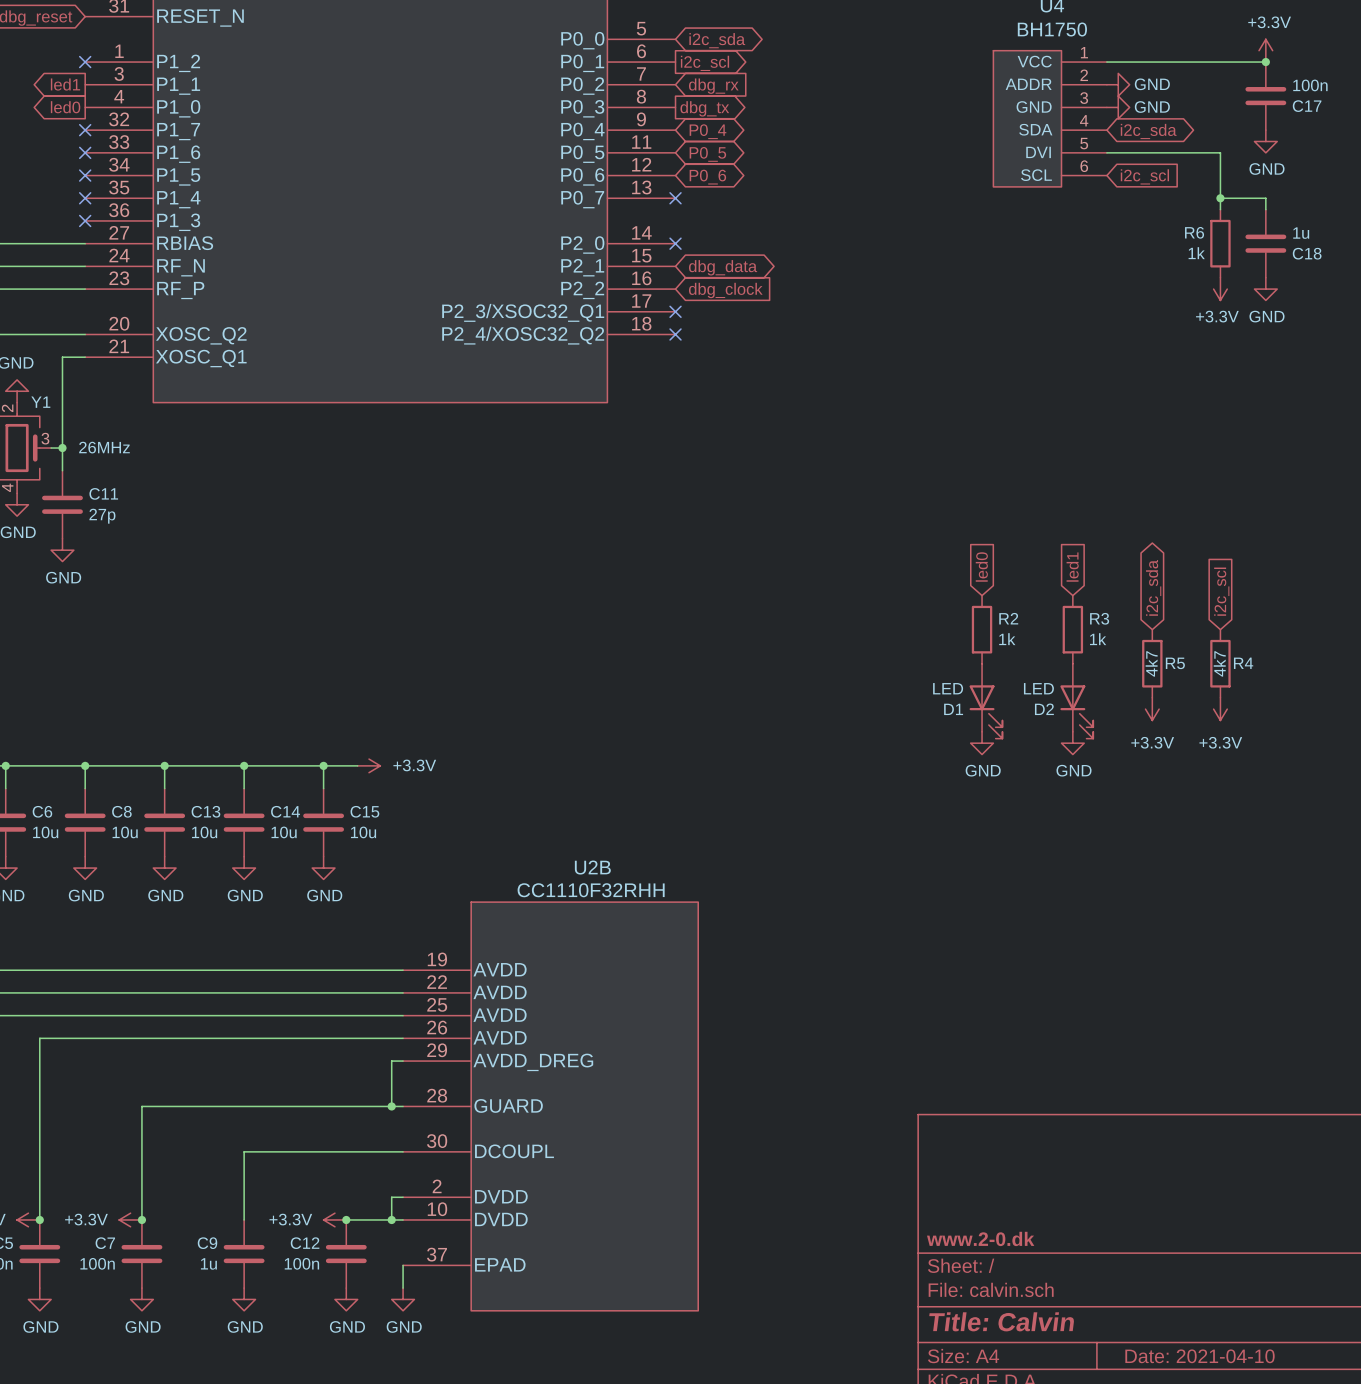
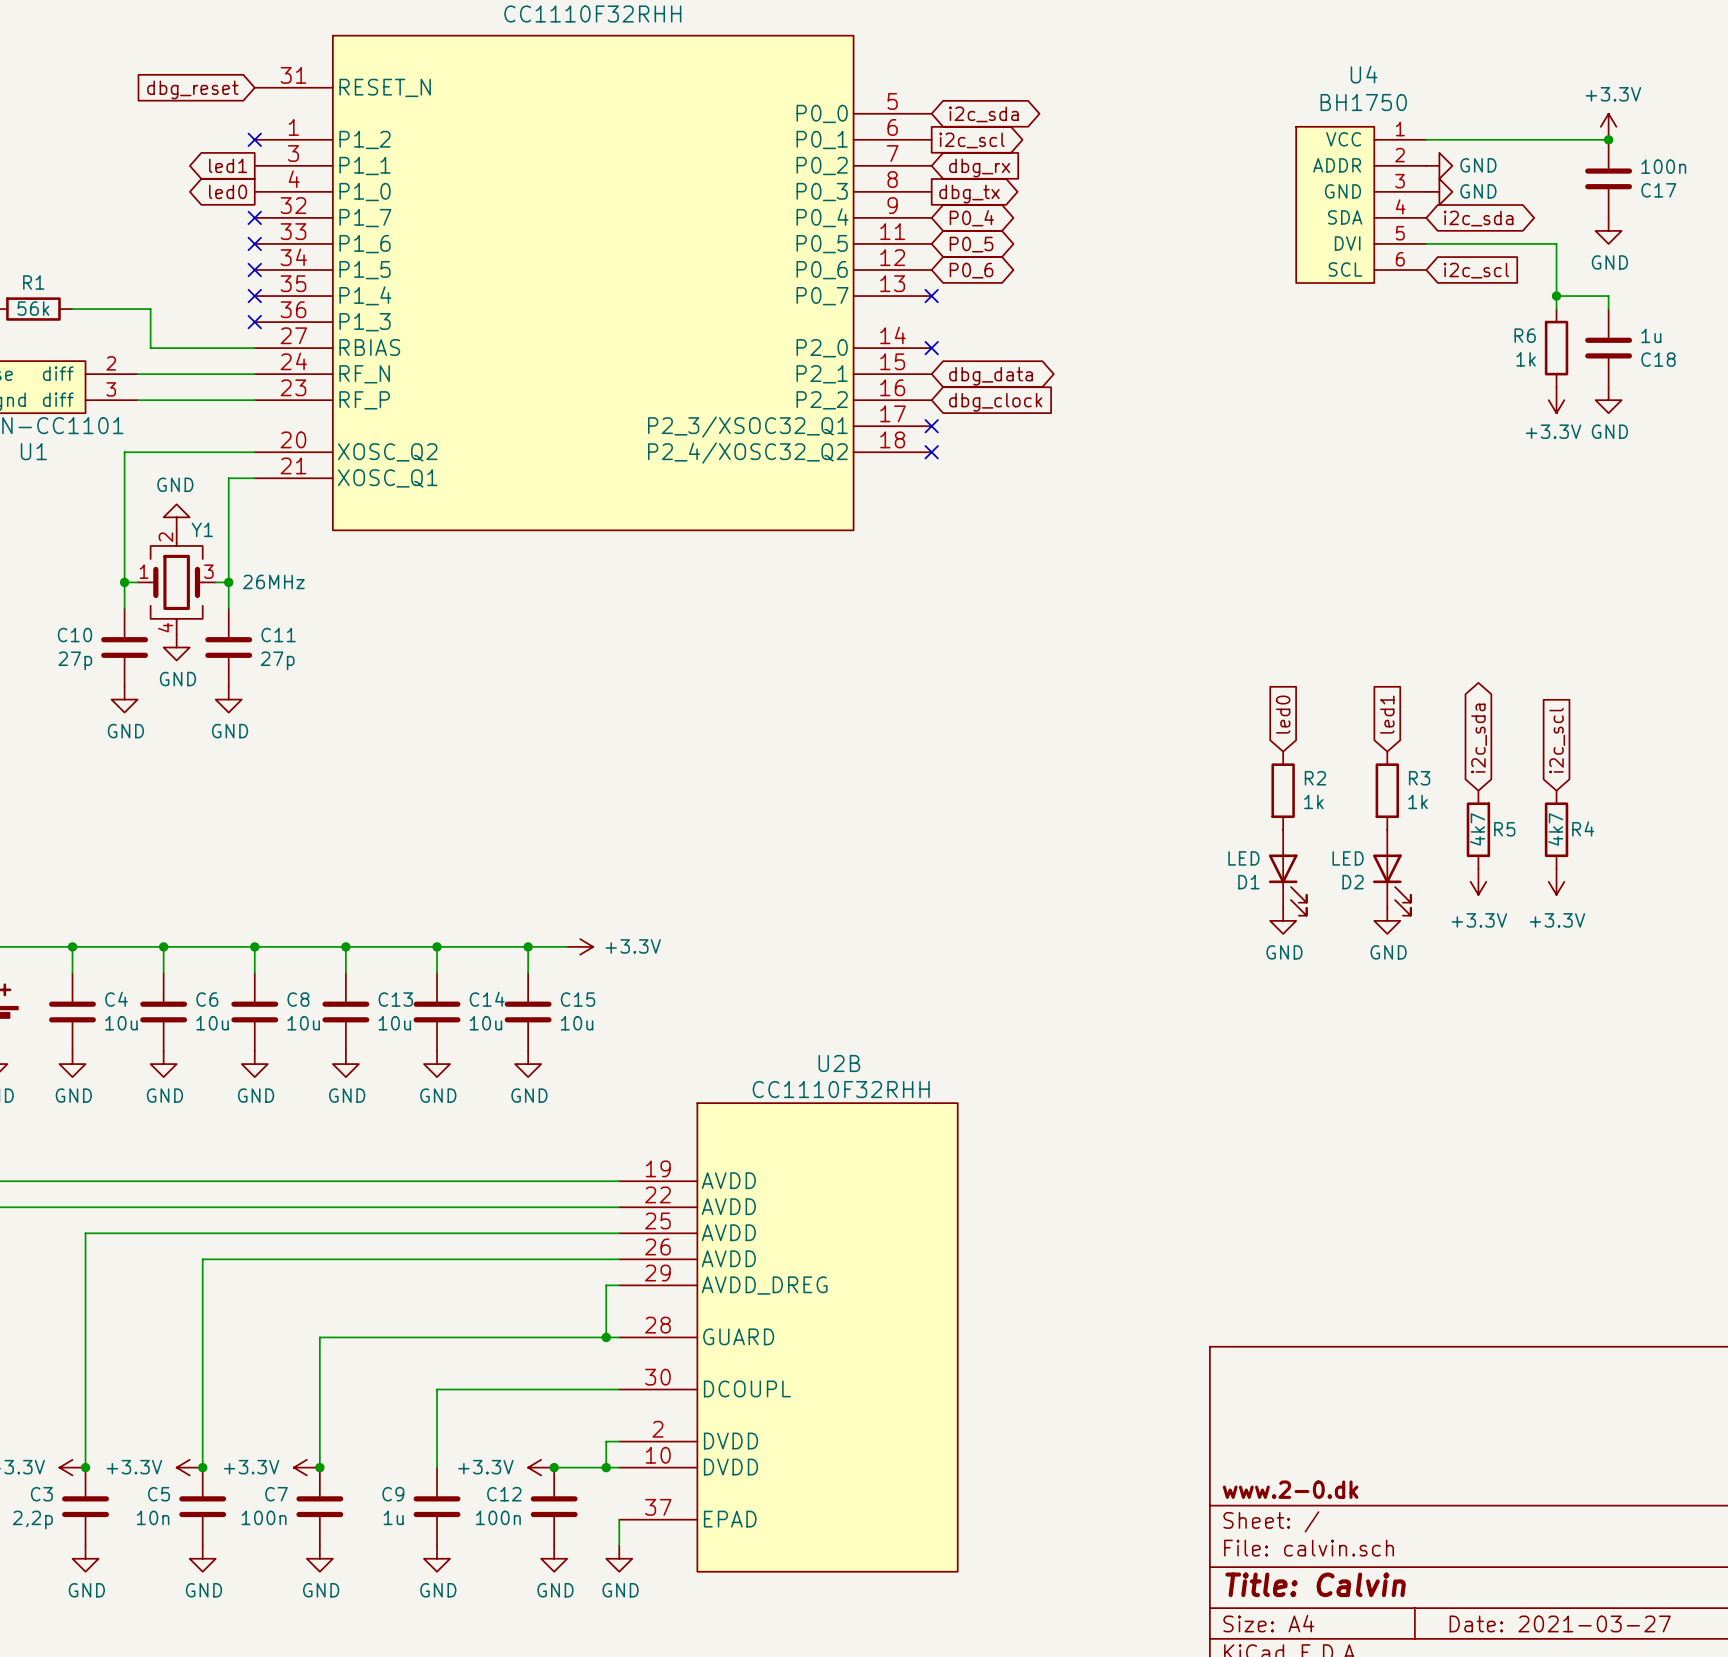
title block: Date: 2021-04-10 (1200, 1356) -> Date: 2021-03-27 (1560, 1623)

